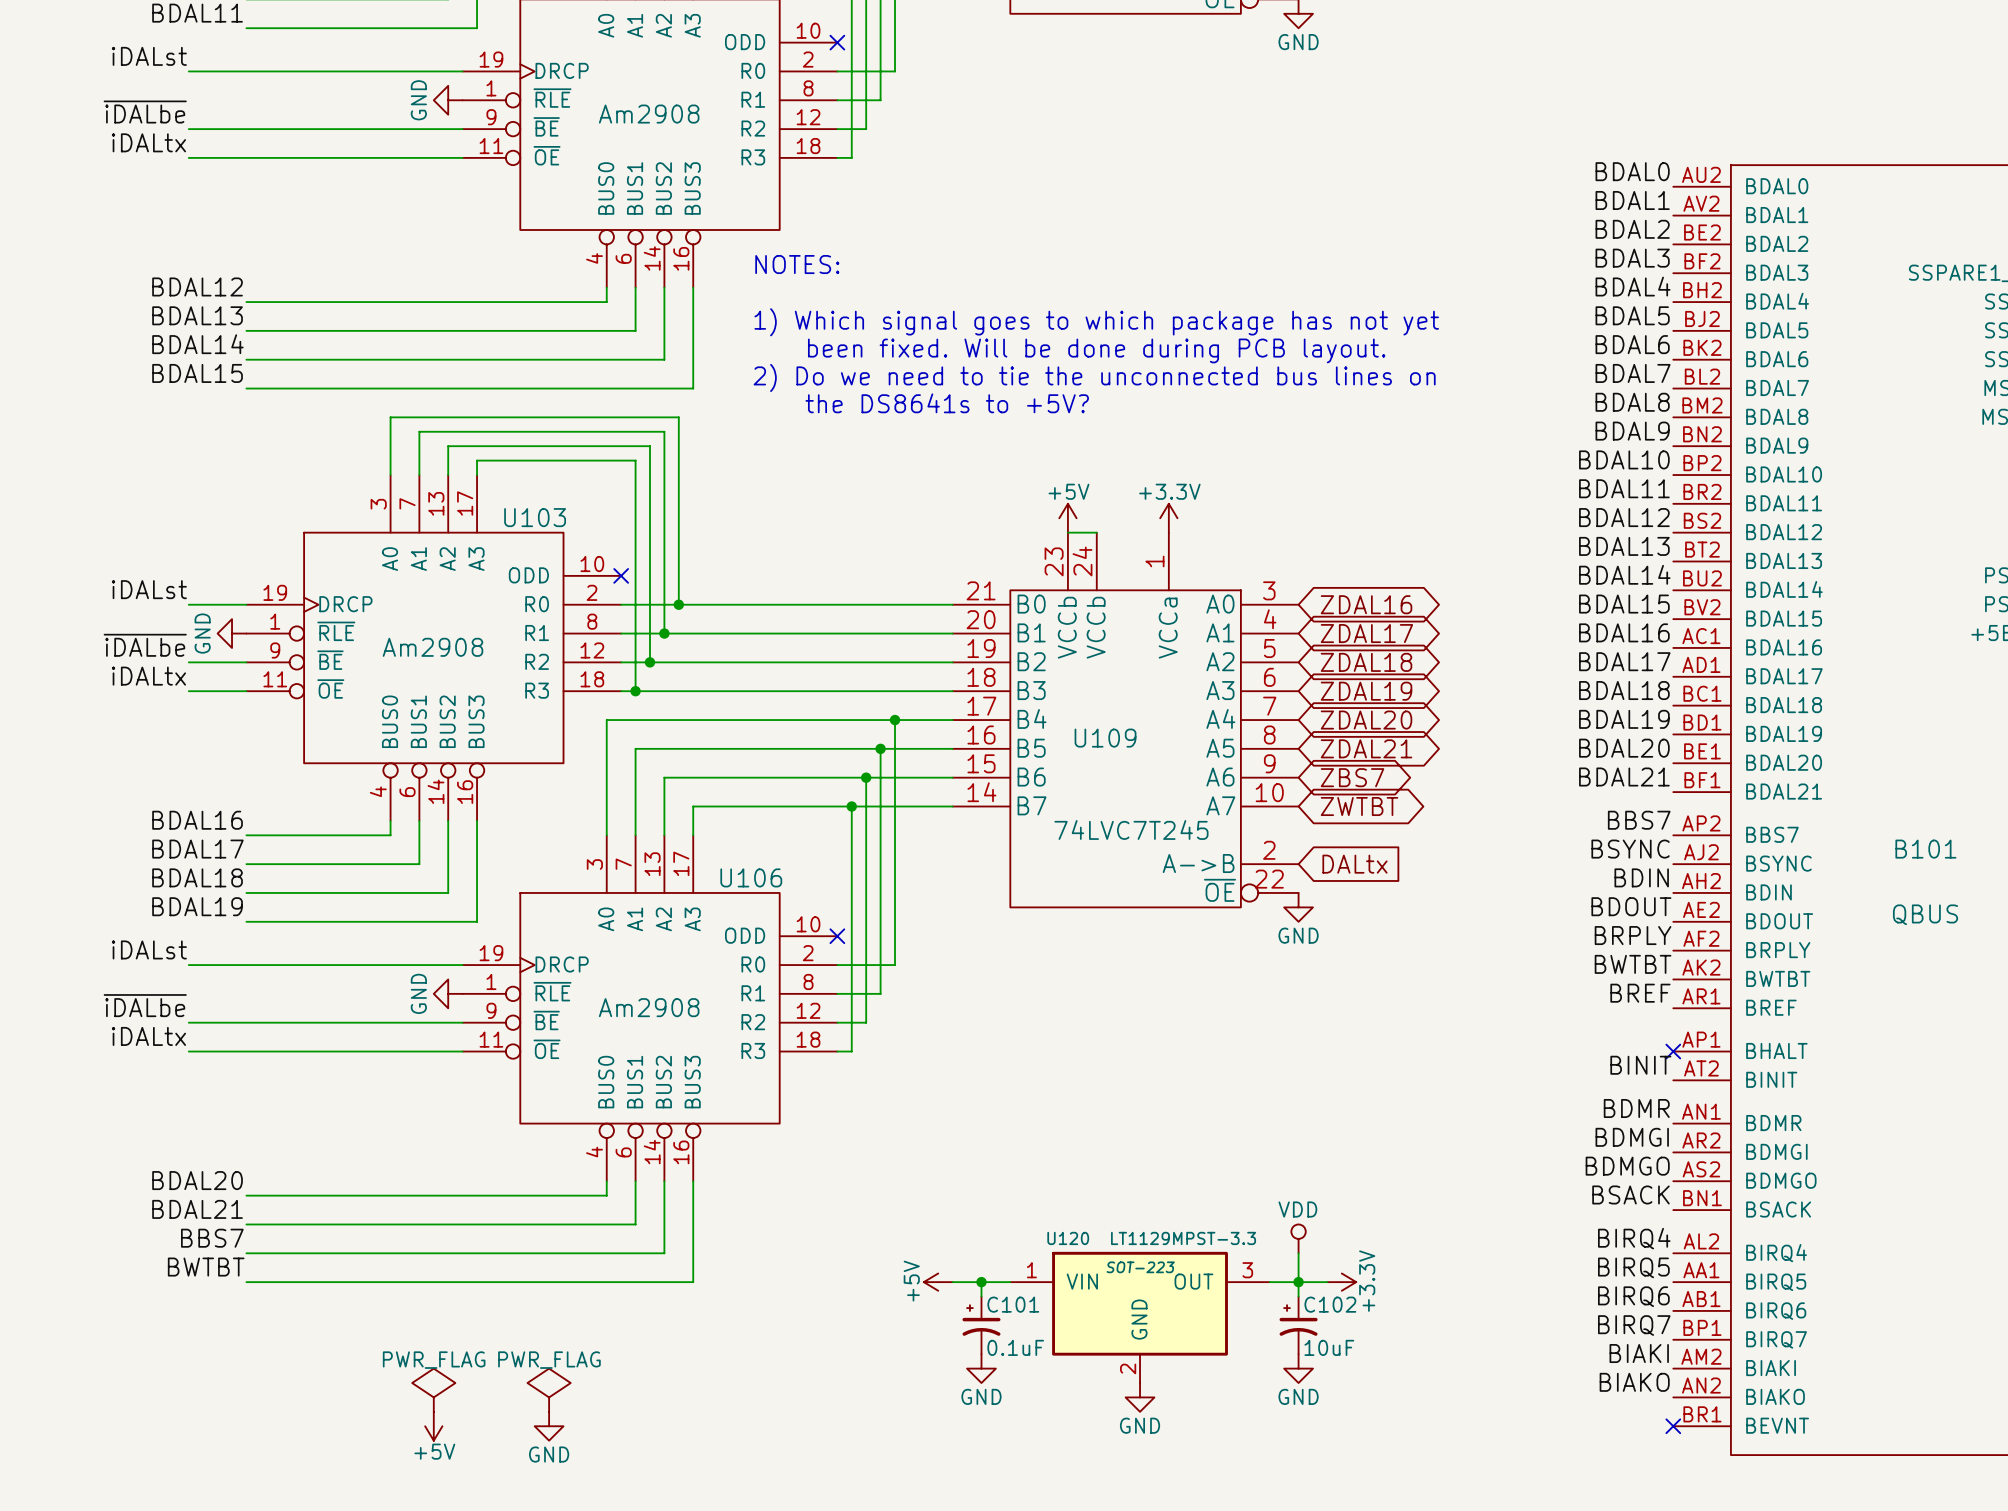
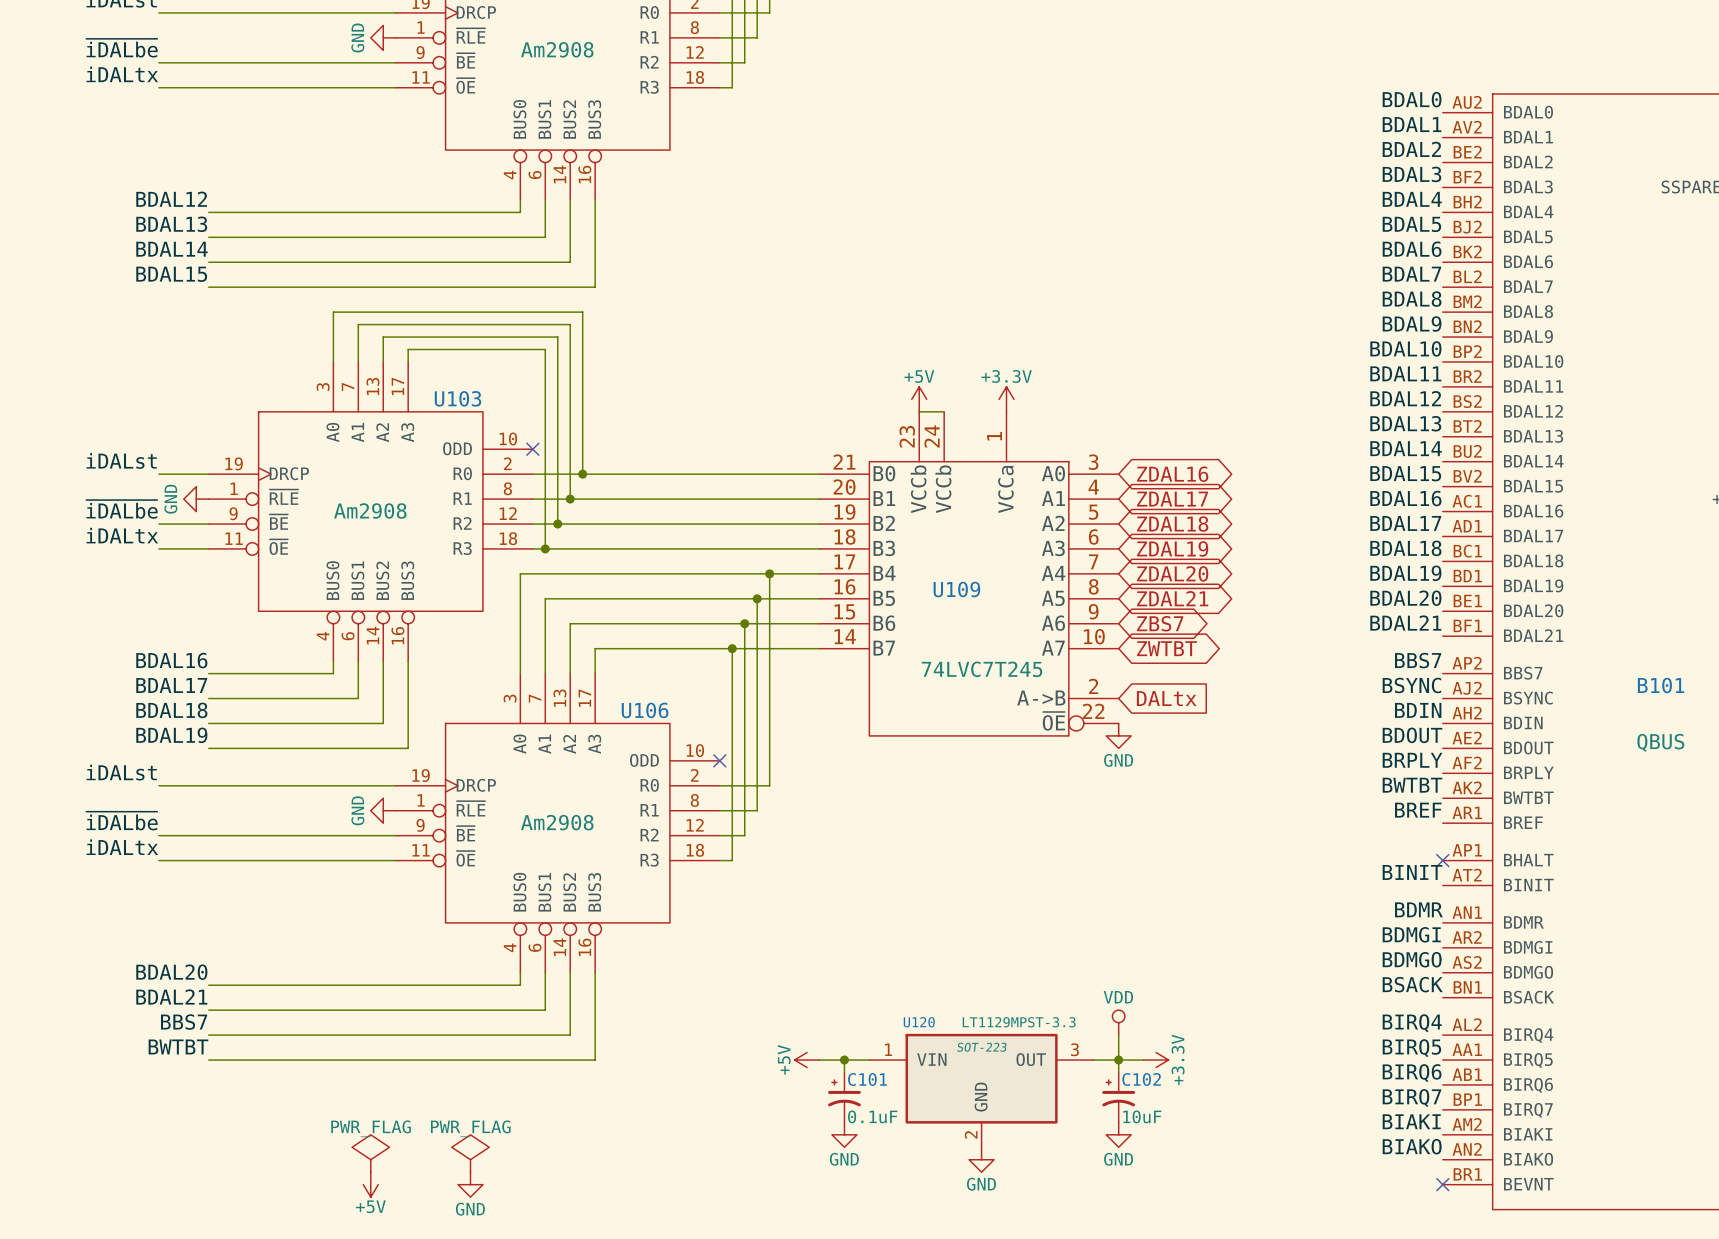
text: NOTES: (797, 264) -> none
text: 1) Which signal goes to which package has not yet (1096, 322) -> none
text: been fixed. Will be done during PCB layout. (1096, 350) -> none
text: 2) Do we need to tie the unconnected bus lines on (1094, 377) -> none
text: the DS8641s to +5V? (947, 403) -> none

